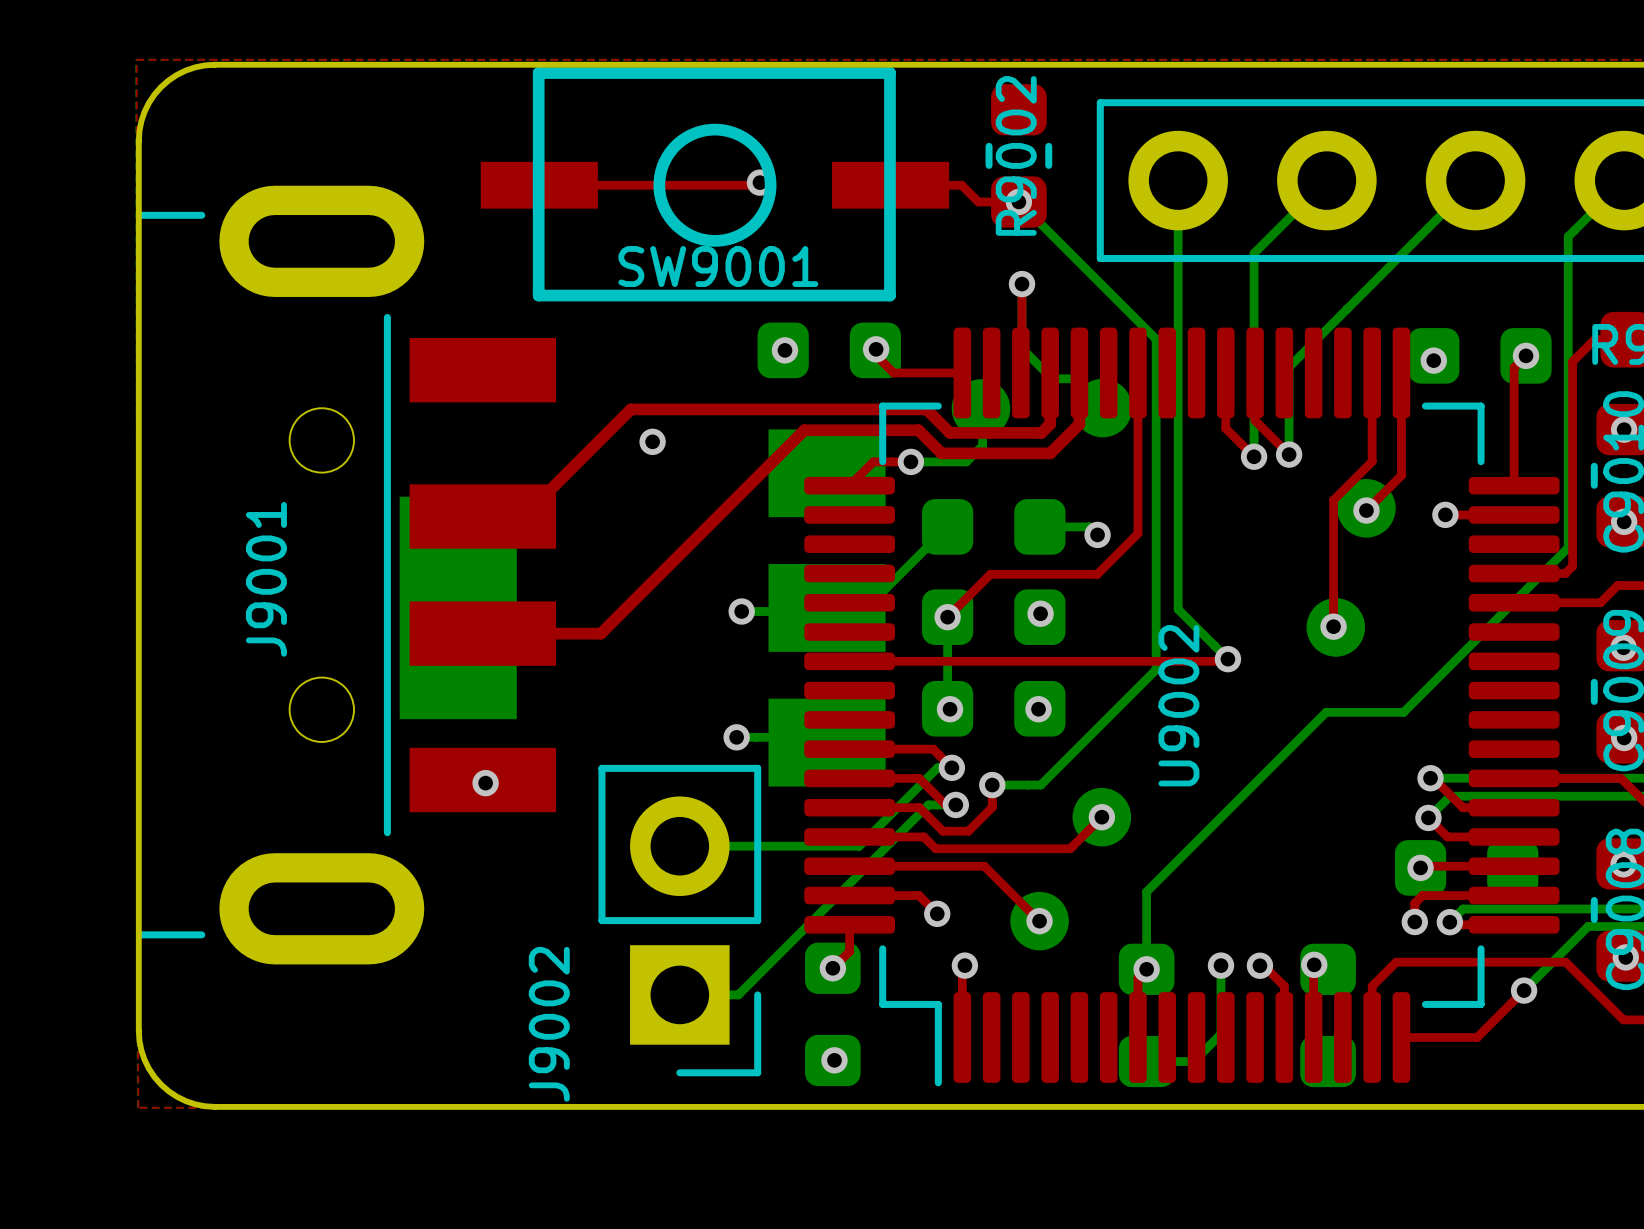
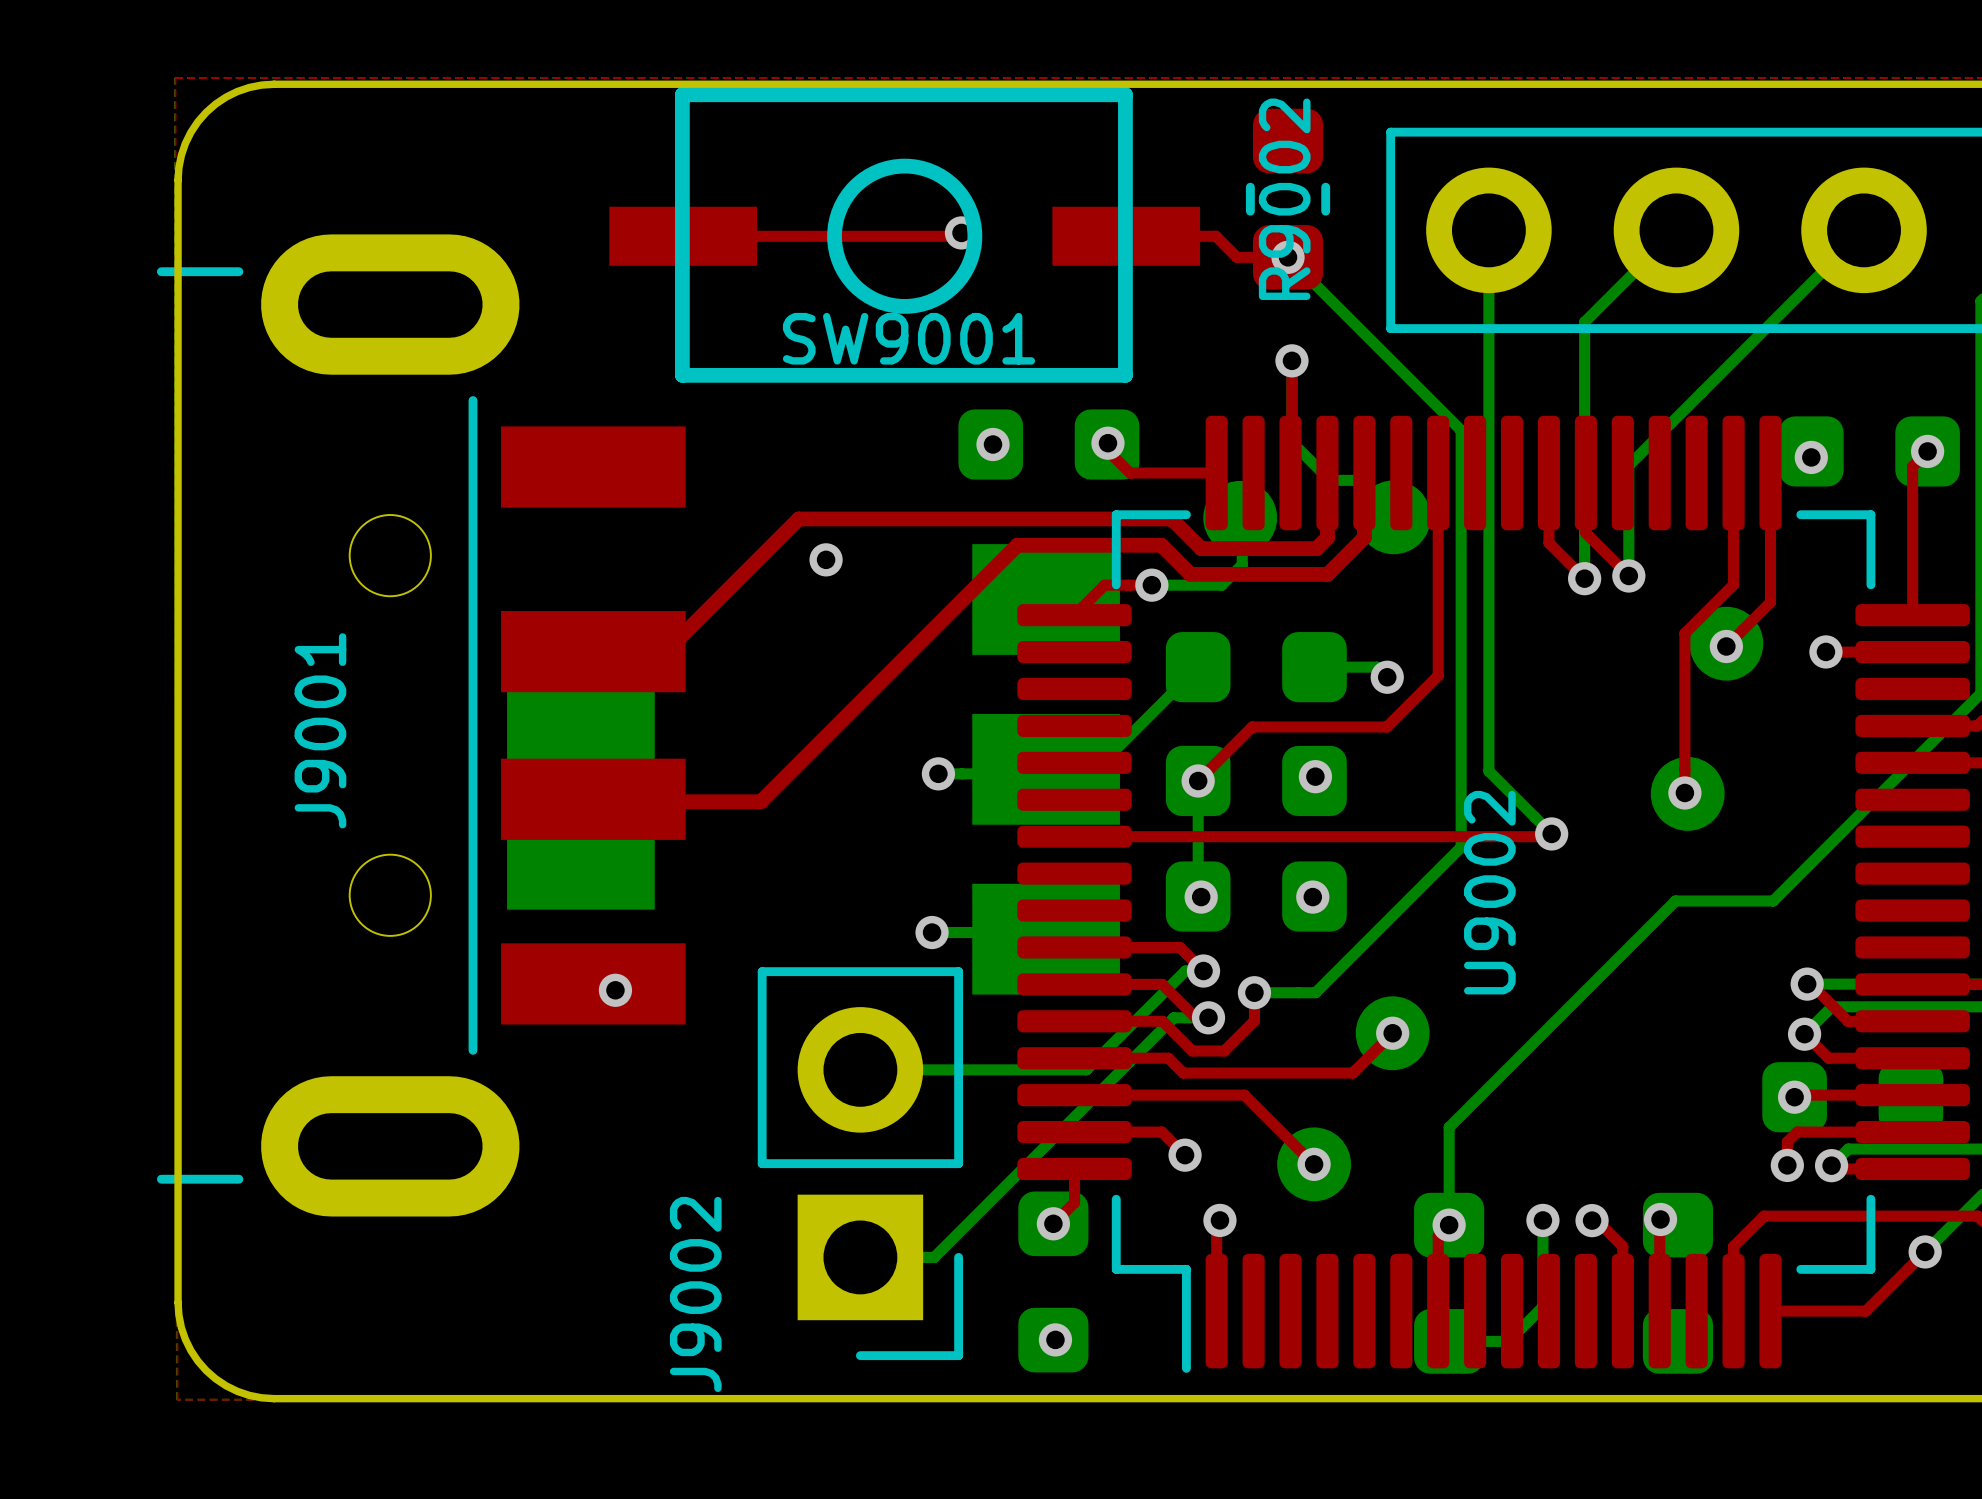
J9001 position: (346, 575) -> (421, 725)

